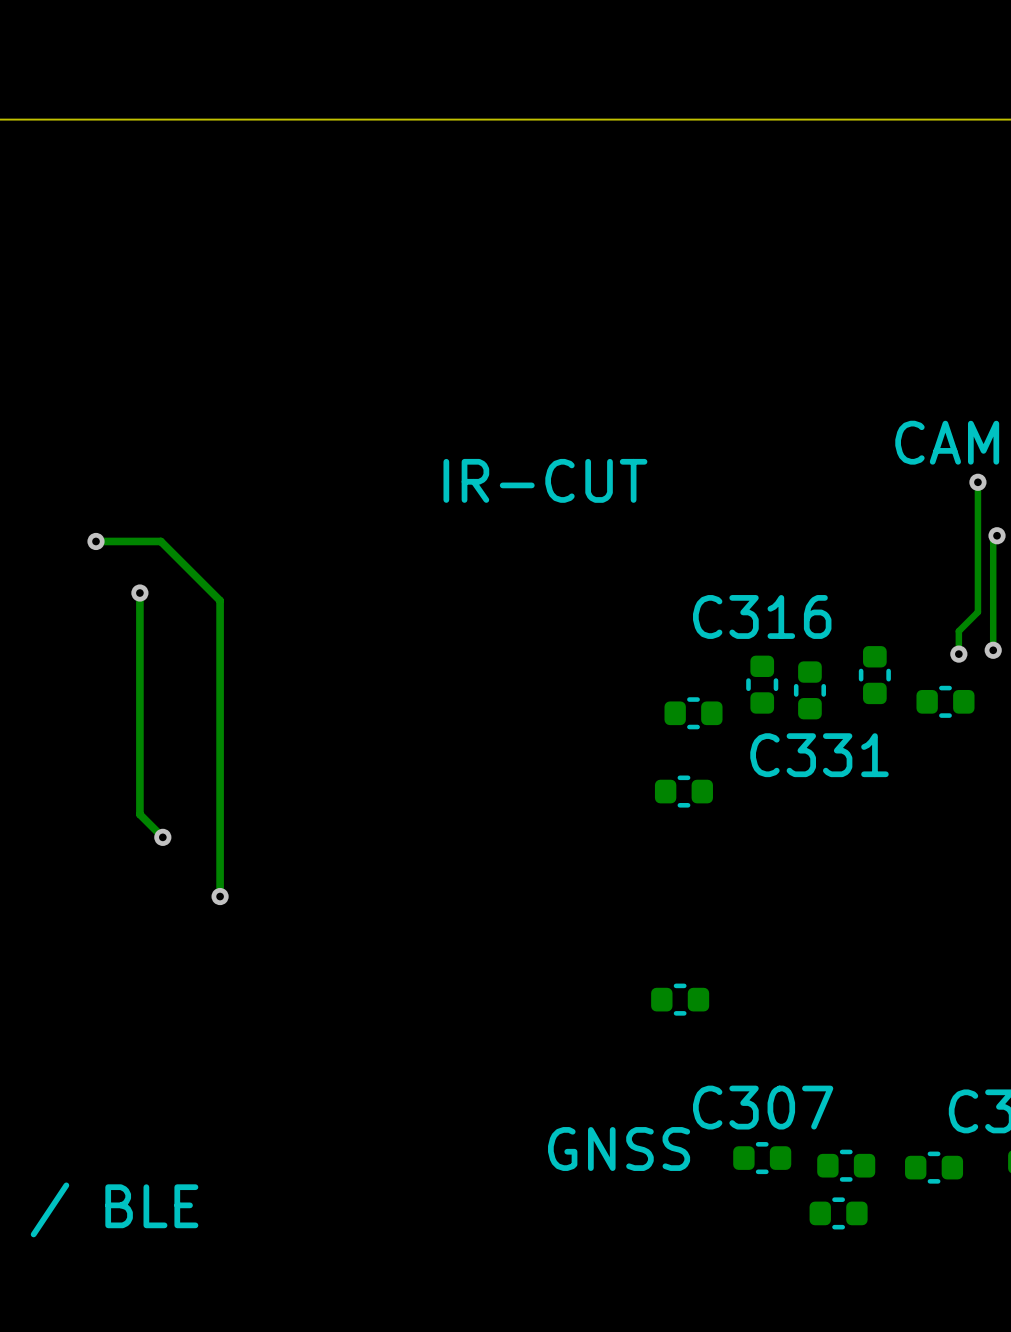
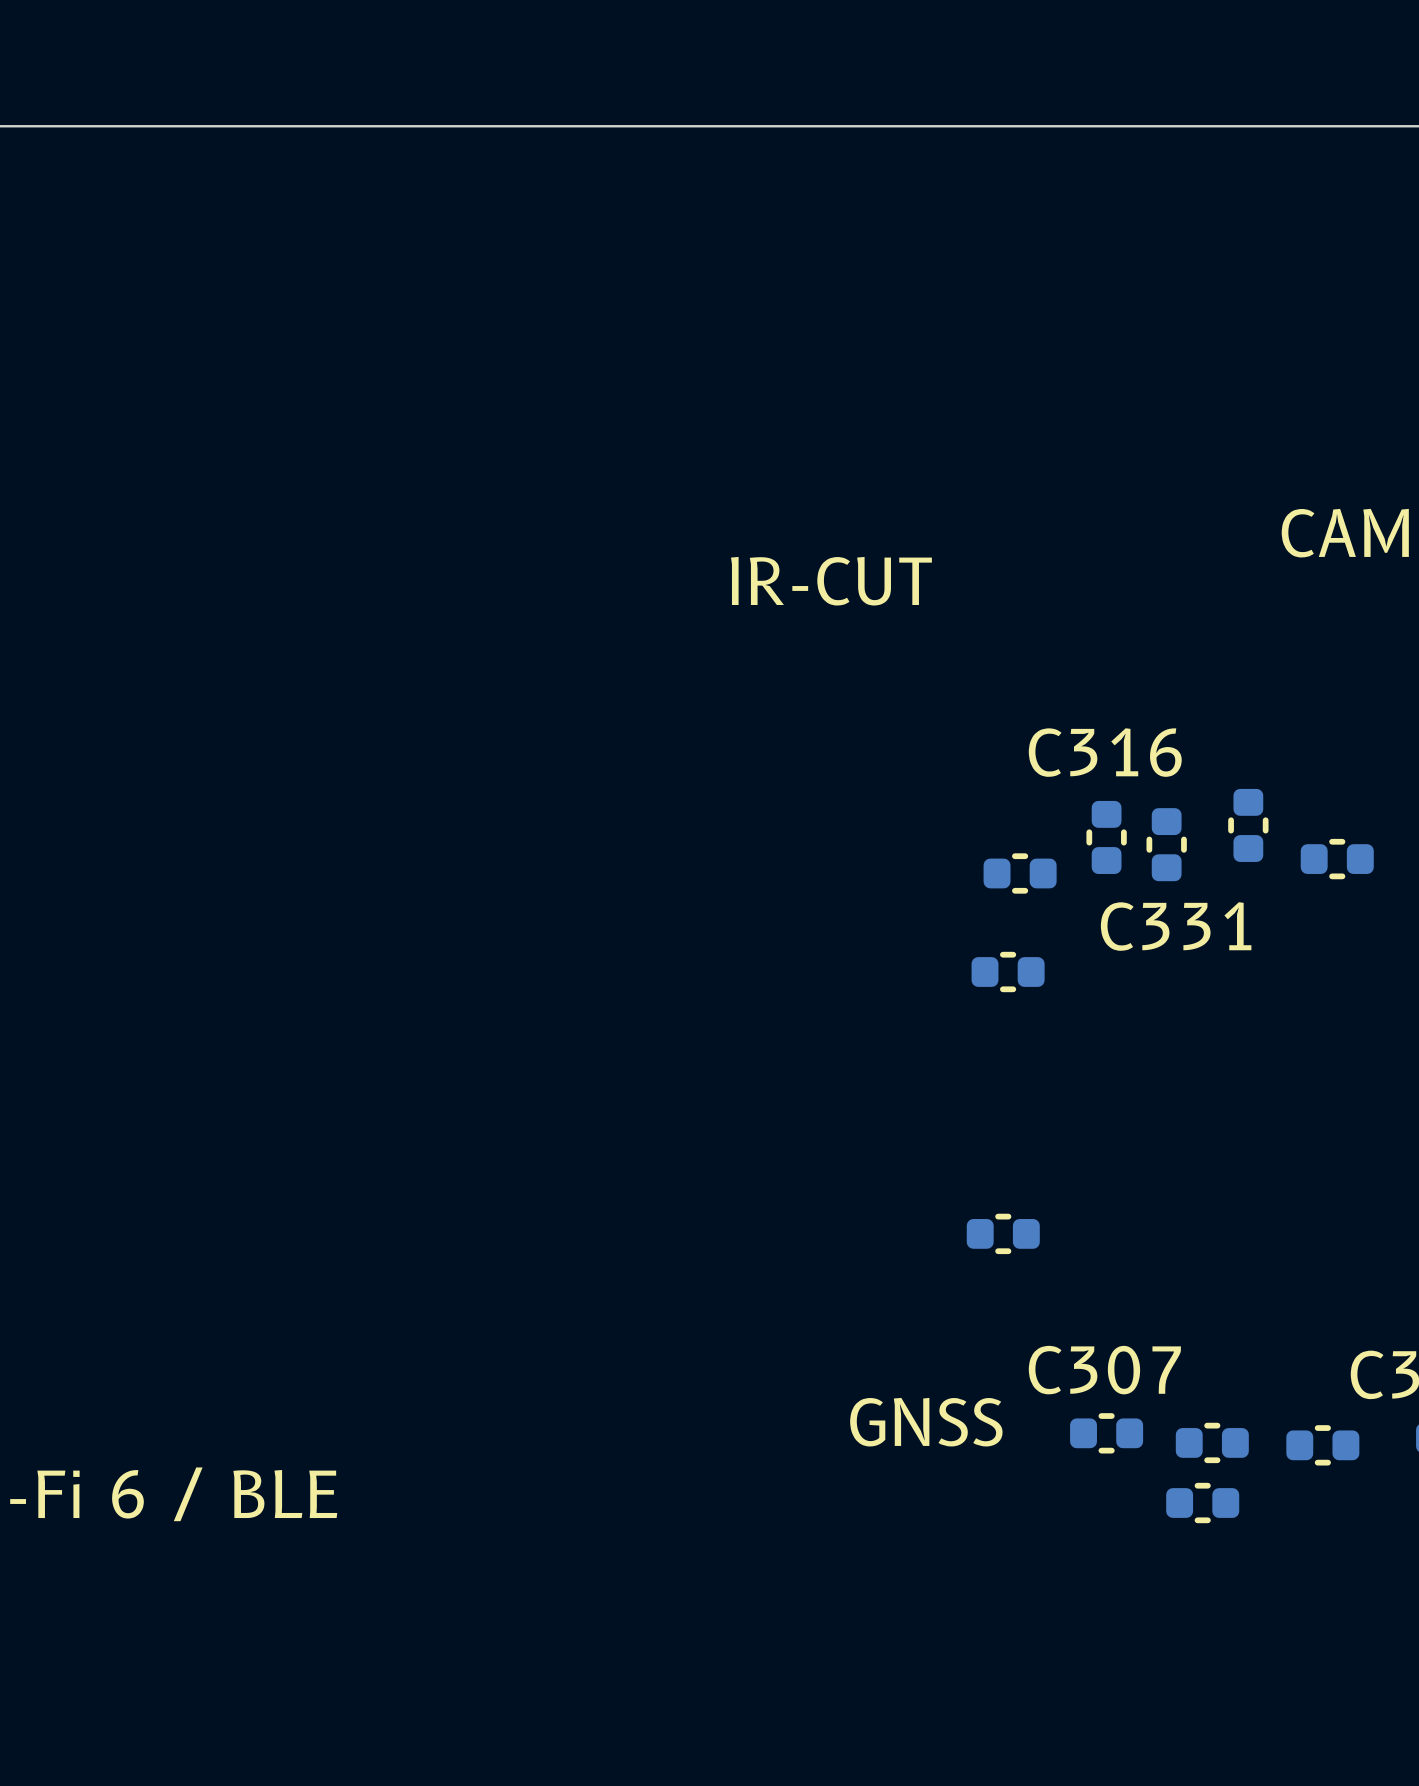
track: (977, 482) (977, 612) (958, 631) (958, 654) -> none
via: (977, 482) -> none
track: (997, 535) (993, 539) (993, 650) -> none
via: (997, 535) -> none
track: (96, 541) (160, 541) (220, 600) (220, 896) -> none
via: (96, 541) -> none
track: (139, 593) (139, 814) (162, 837) -> none
via: (139, 593) -> none
via: (993, 650) -> none
via: (958, 654) -> none
via: (162, 837) -> none
via: (220, 896) -> none

